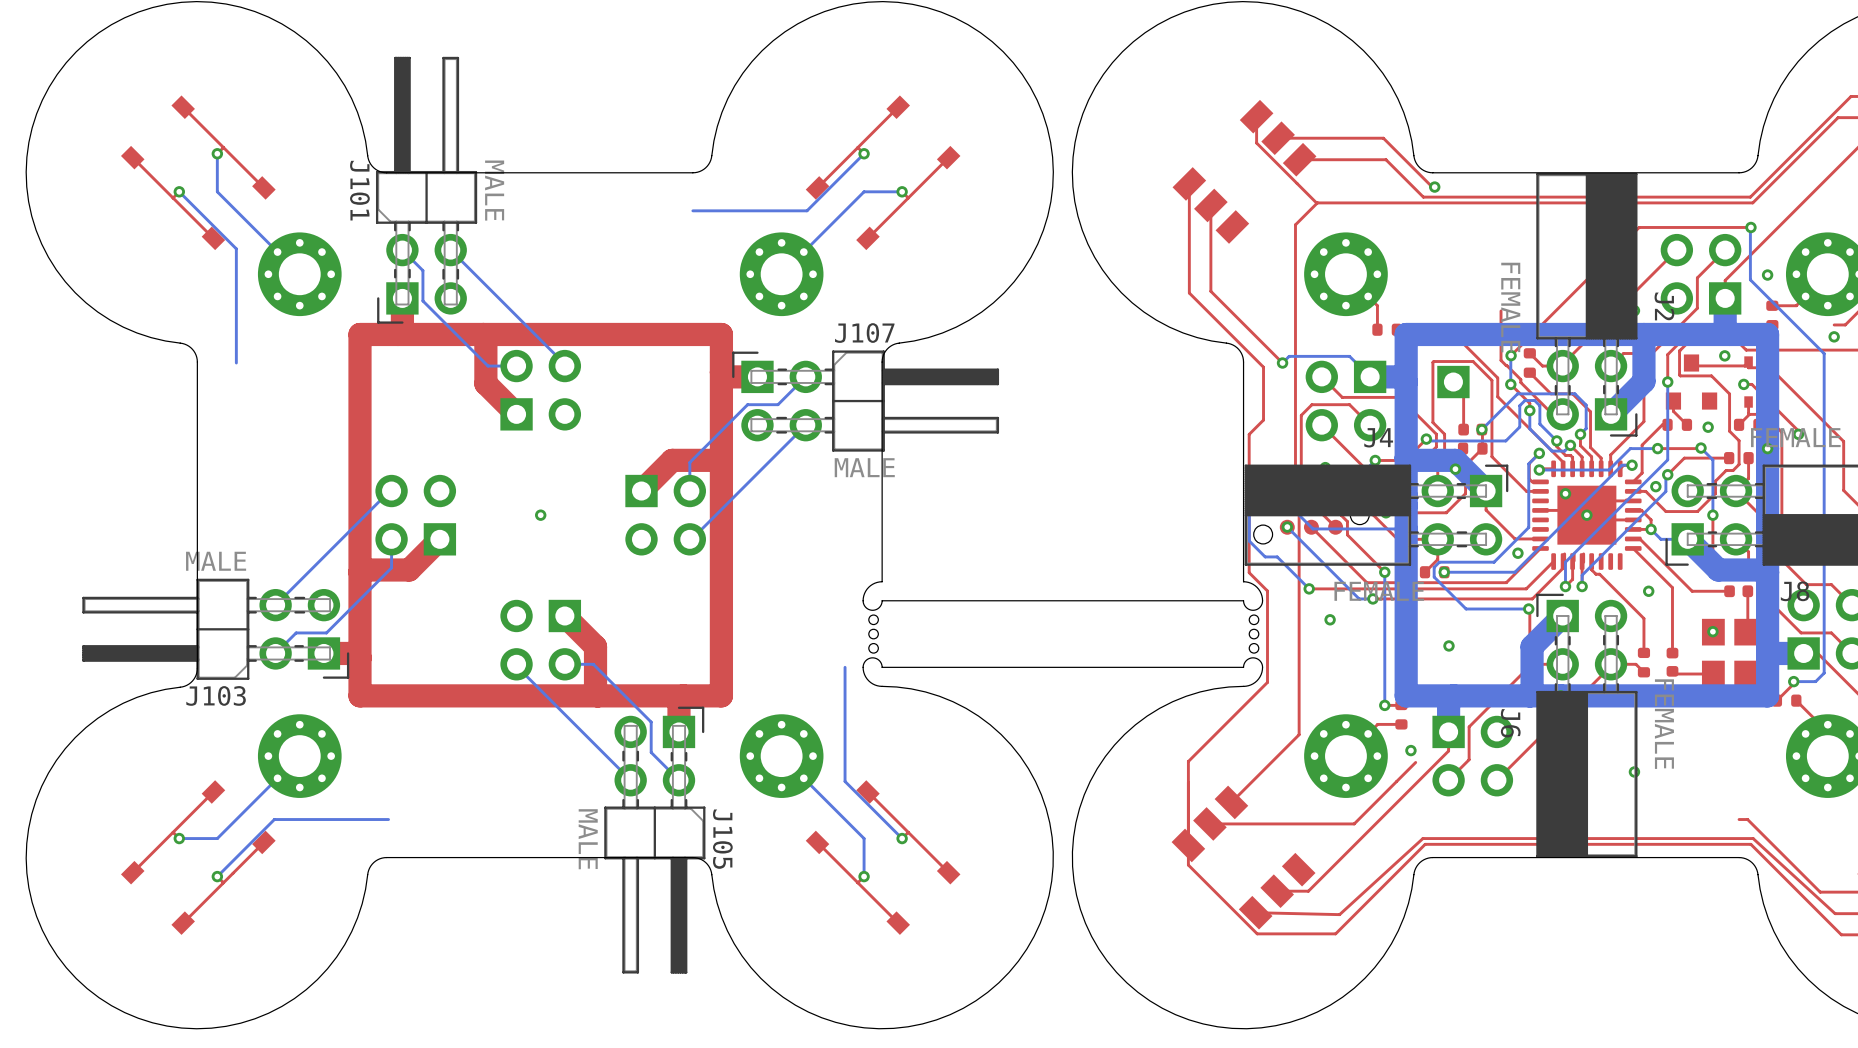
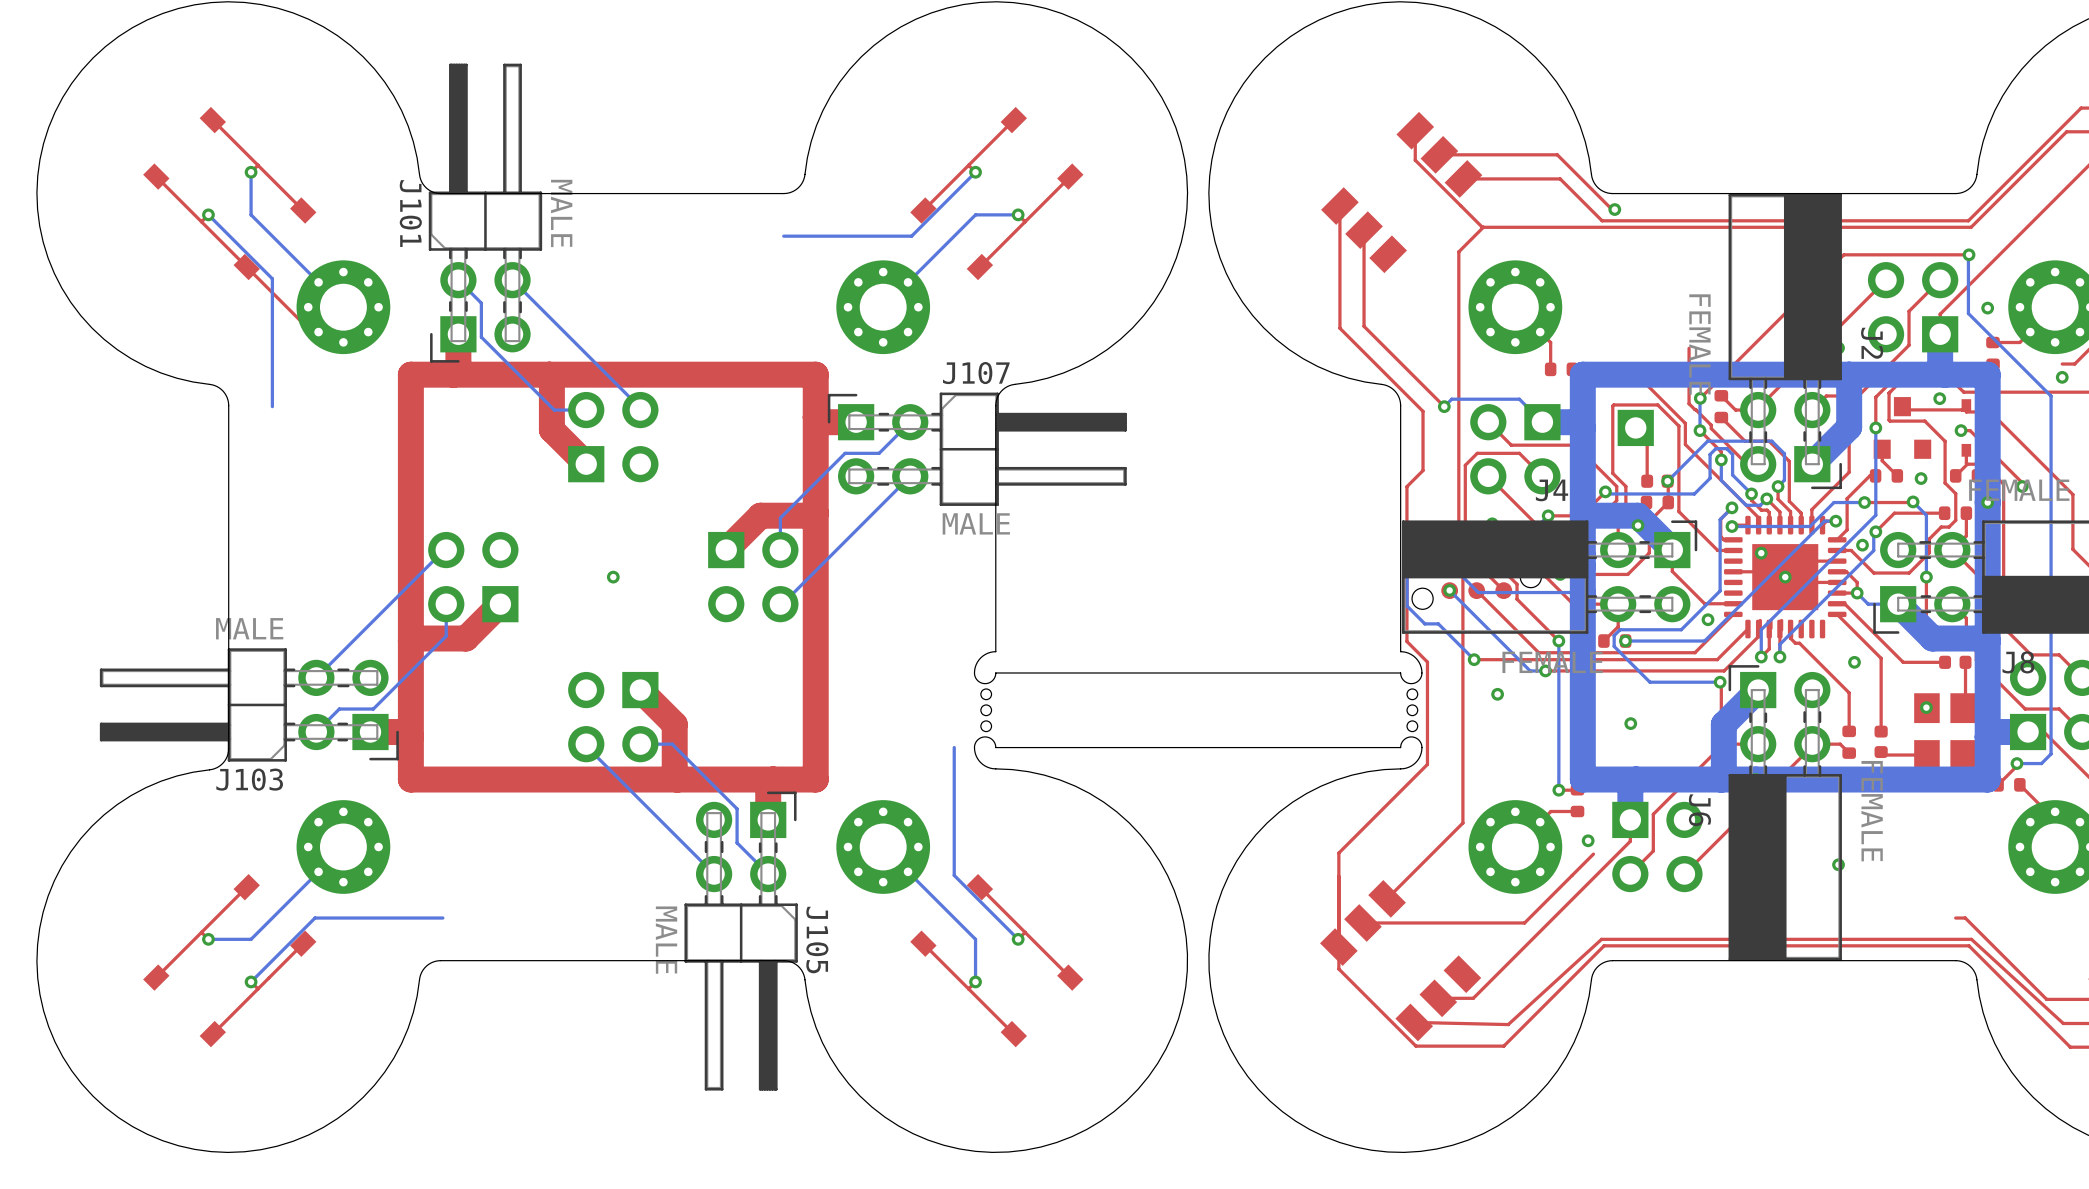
top track: none -> (246, 267) (311, 332)

